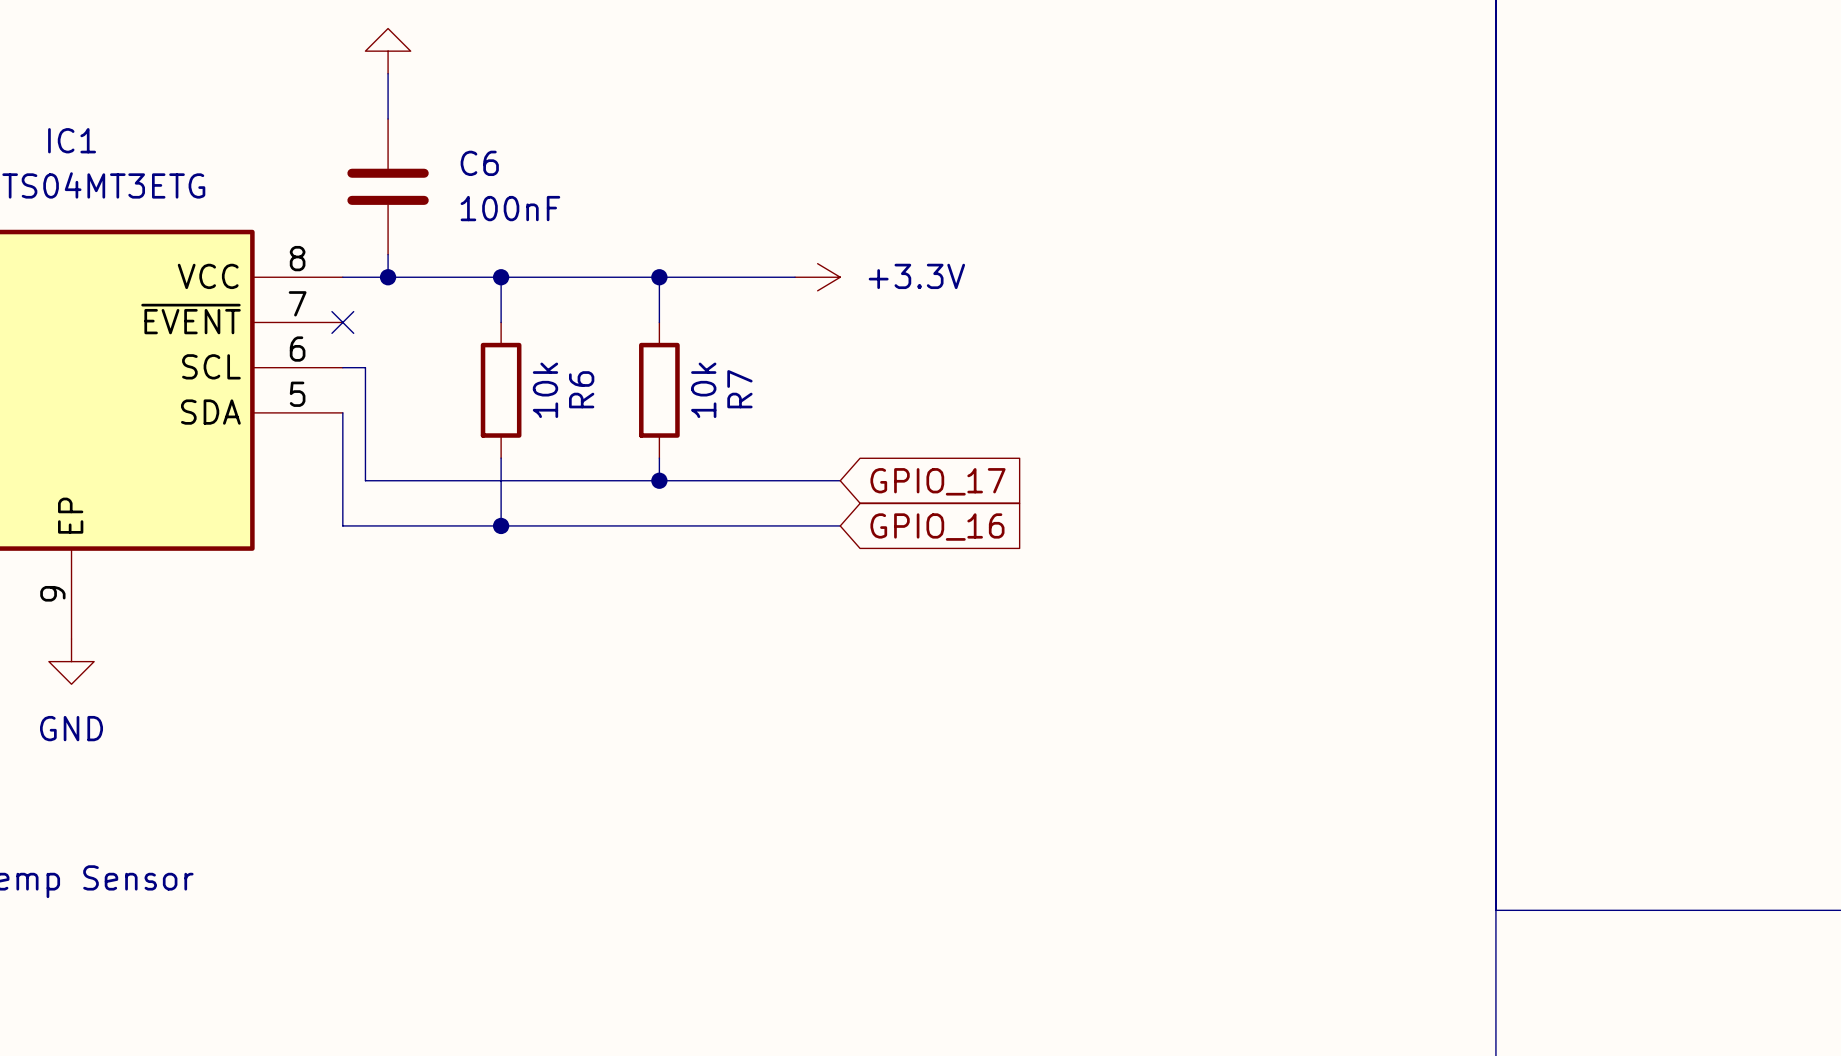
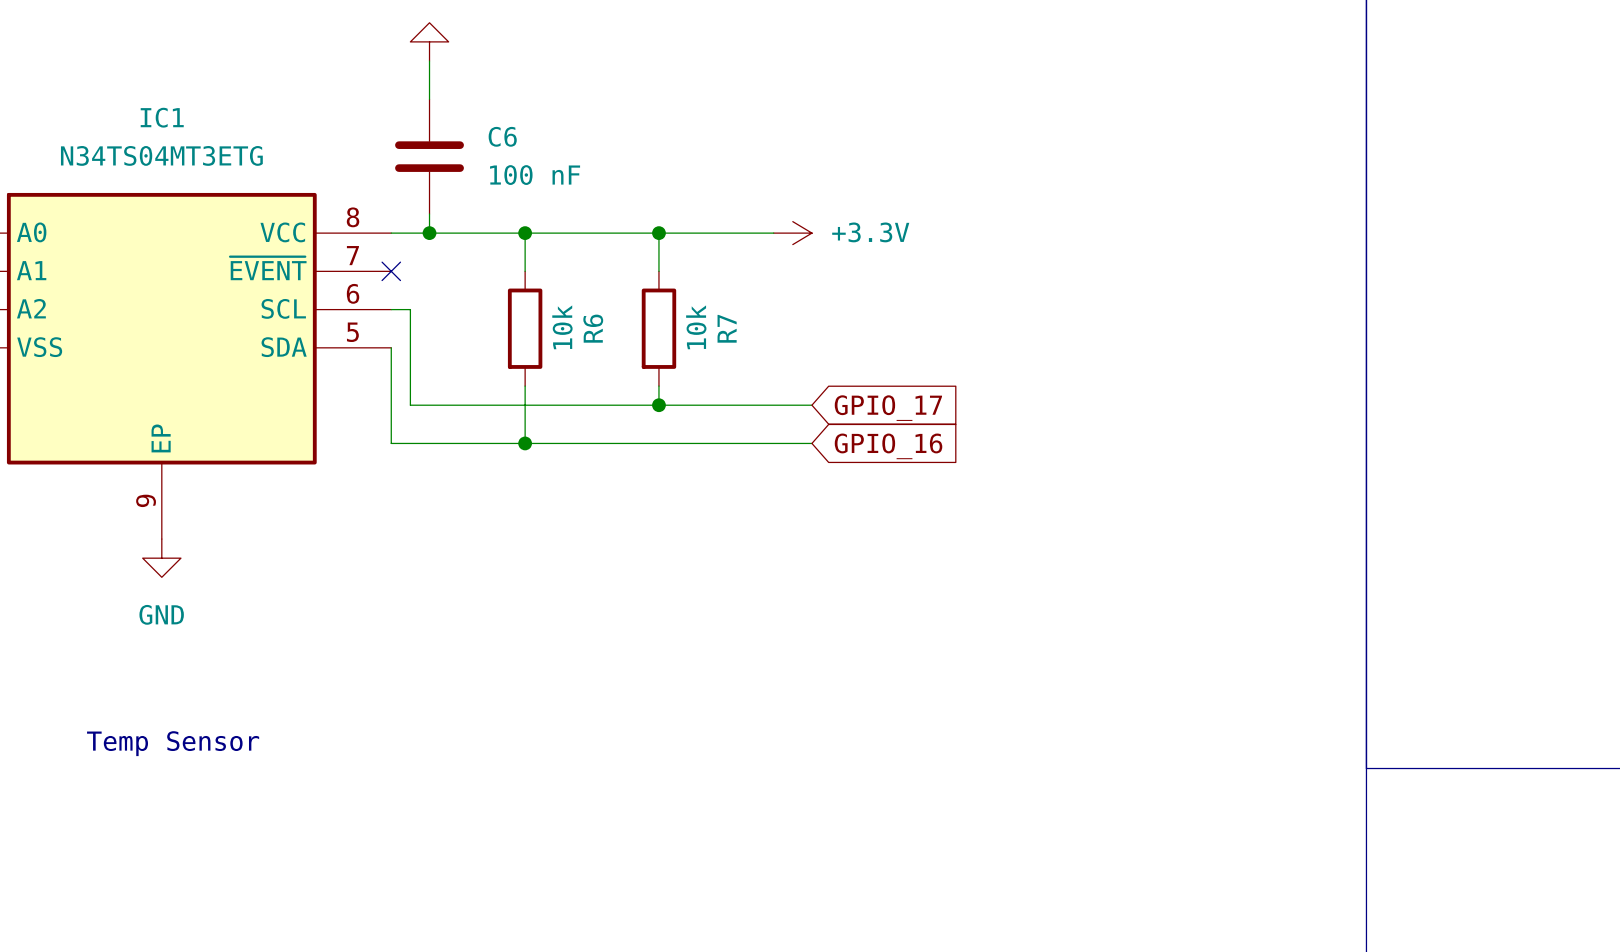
C6 value: 100nF (510, 208) -> 100 nF (535, 175)

